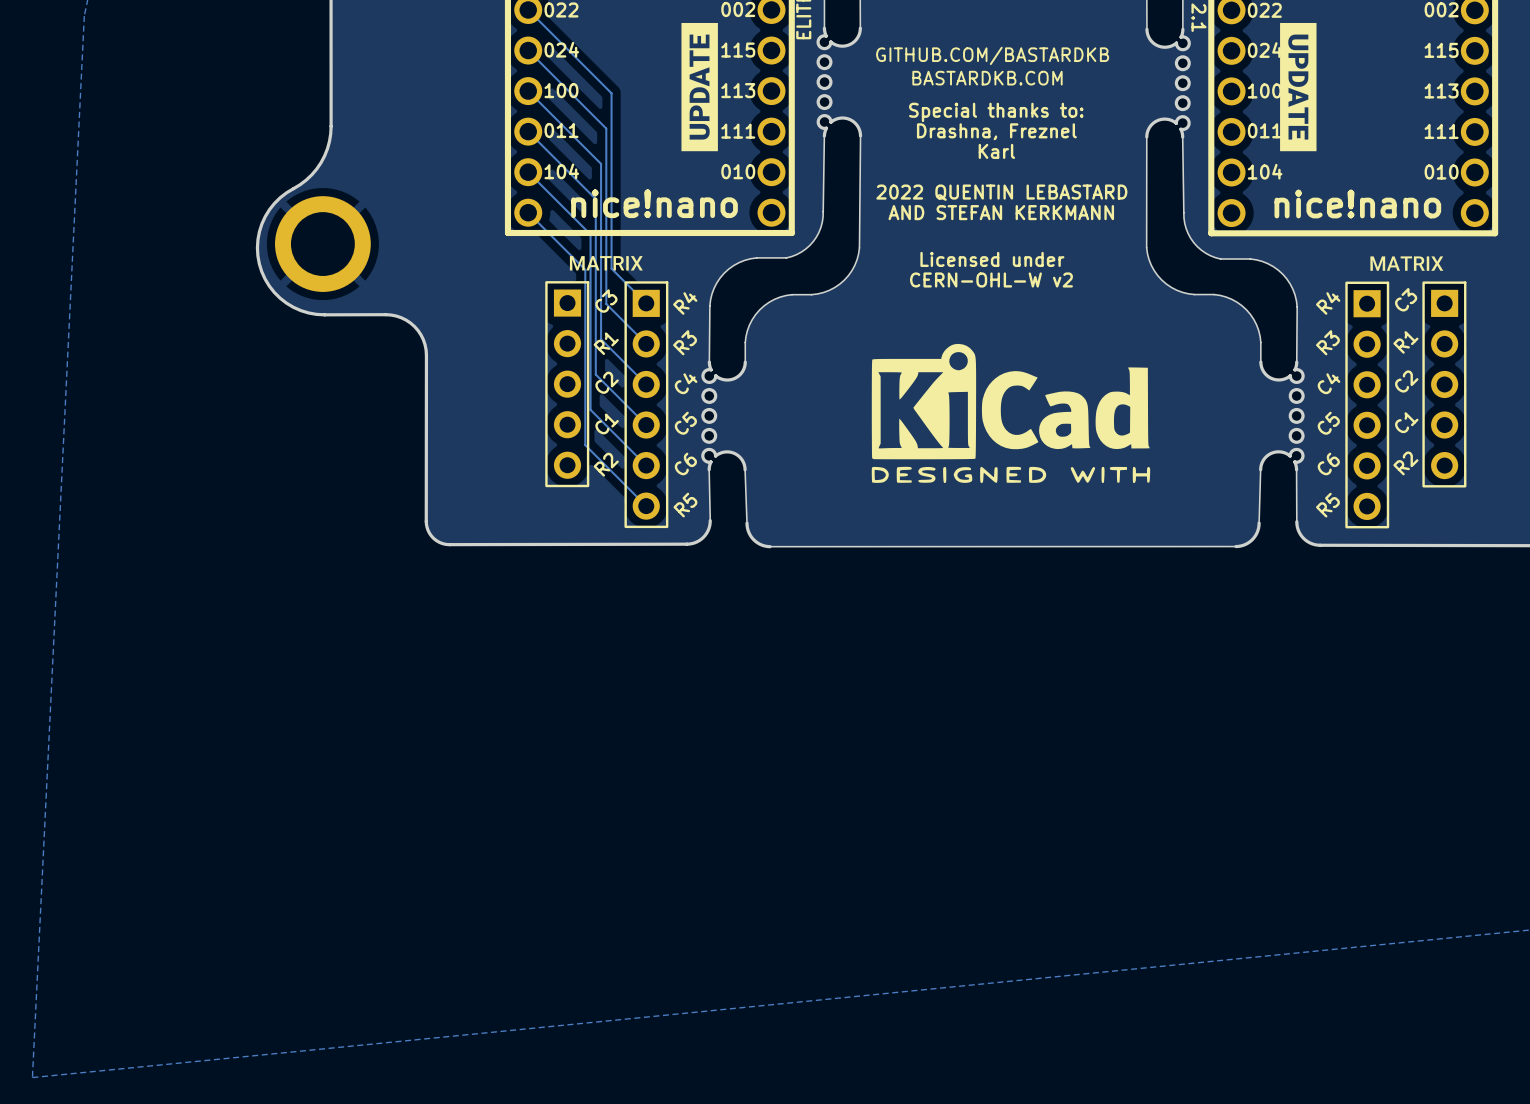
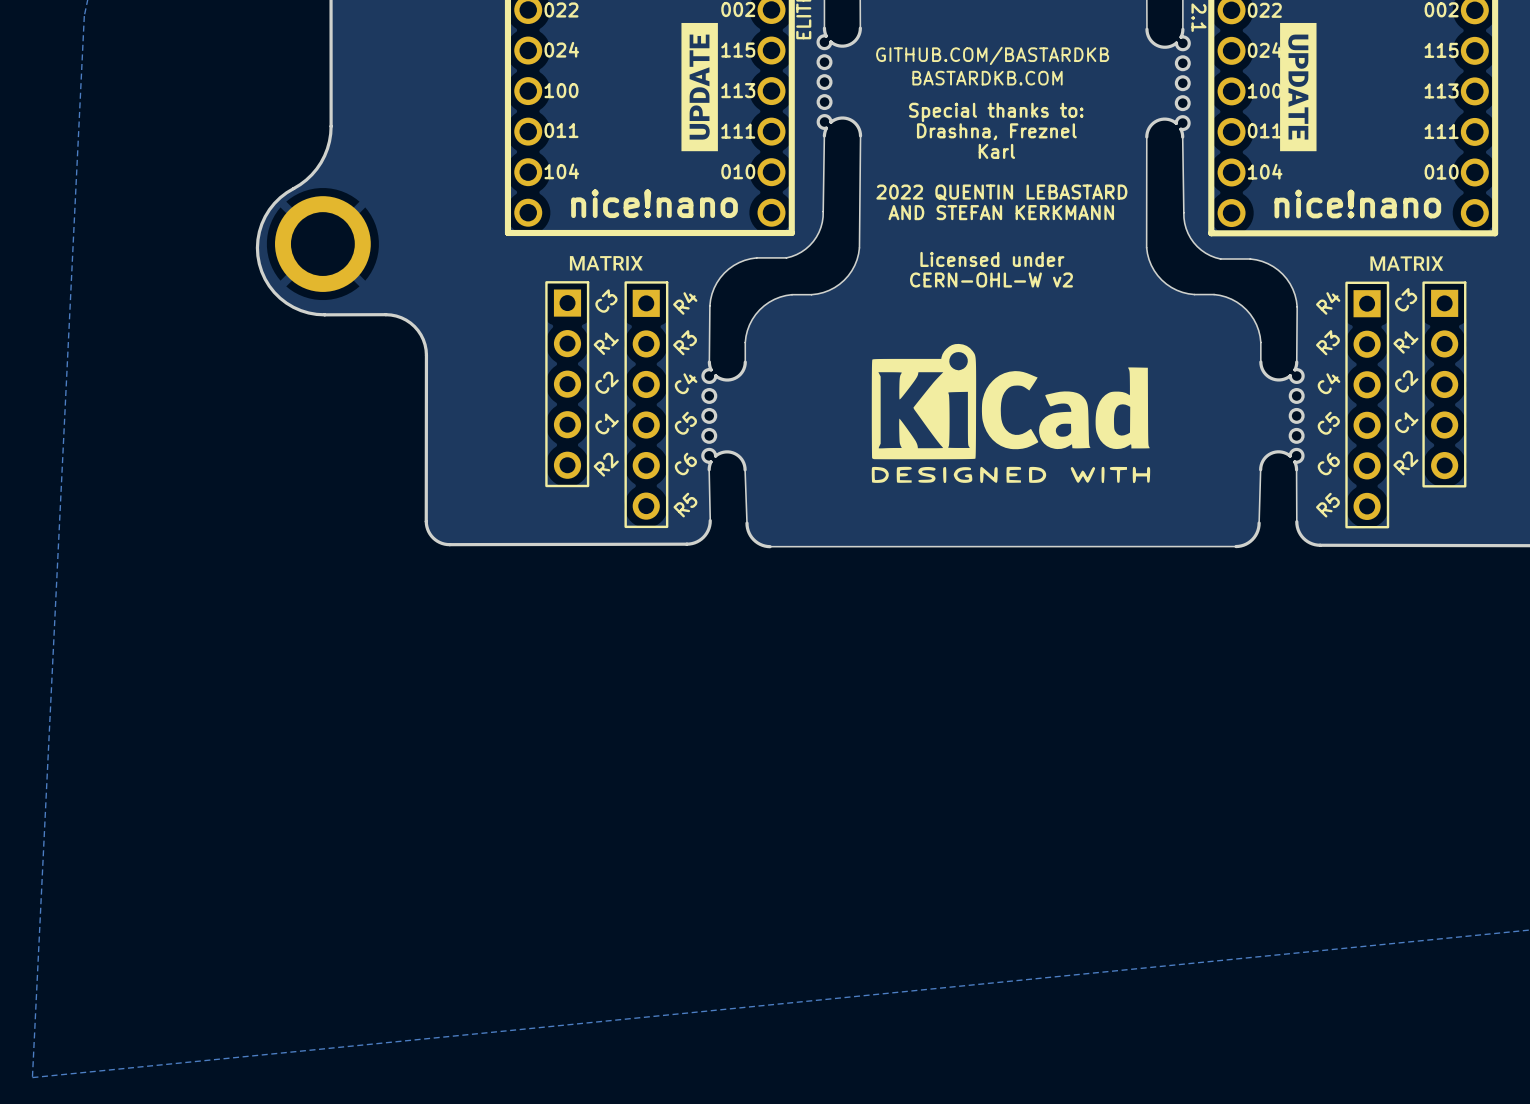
track: (528, 9) (611, 93) (611, 268) (646, 303) -> none
track: (528, 50) (606, 128) (606, 303) (646, 343) -> none
track: (528, 91) (601, 163) (601, 339) (646, 384) -> none
track: (528, 131) (595, 199) (595, 374) (646, 425) -> none
track: (528, 172) (590, 234) (590, 409) (646, 465) -> none
track: (528, 212) (585, 269) (585, 445) (646, 506) -> none

